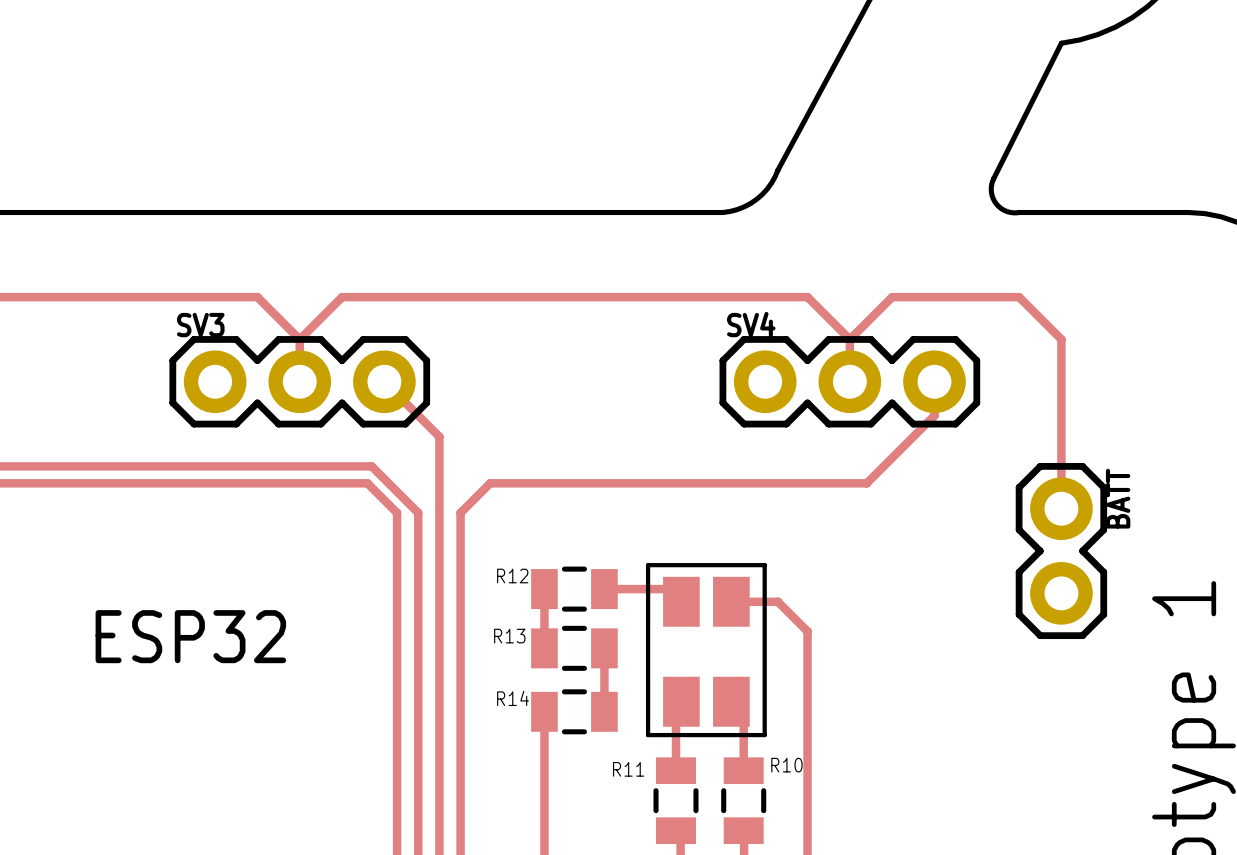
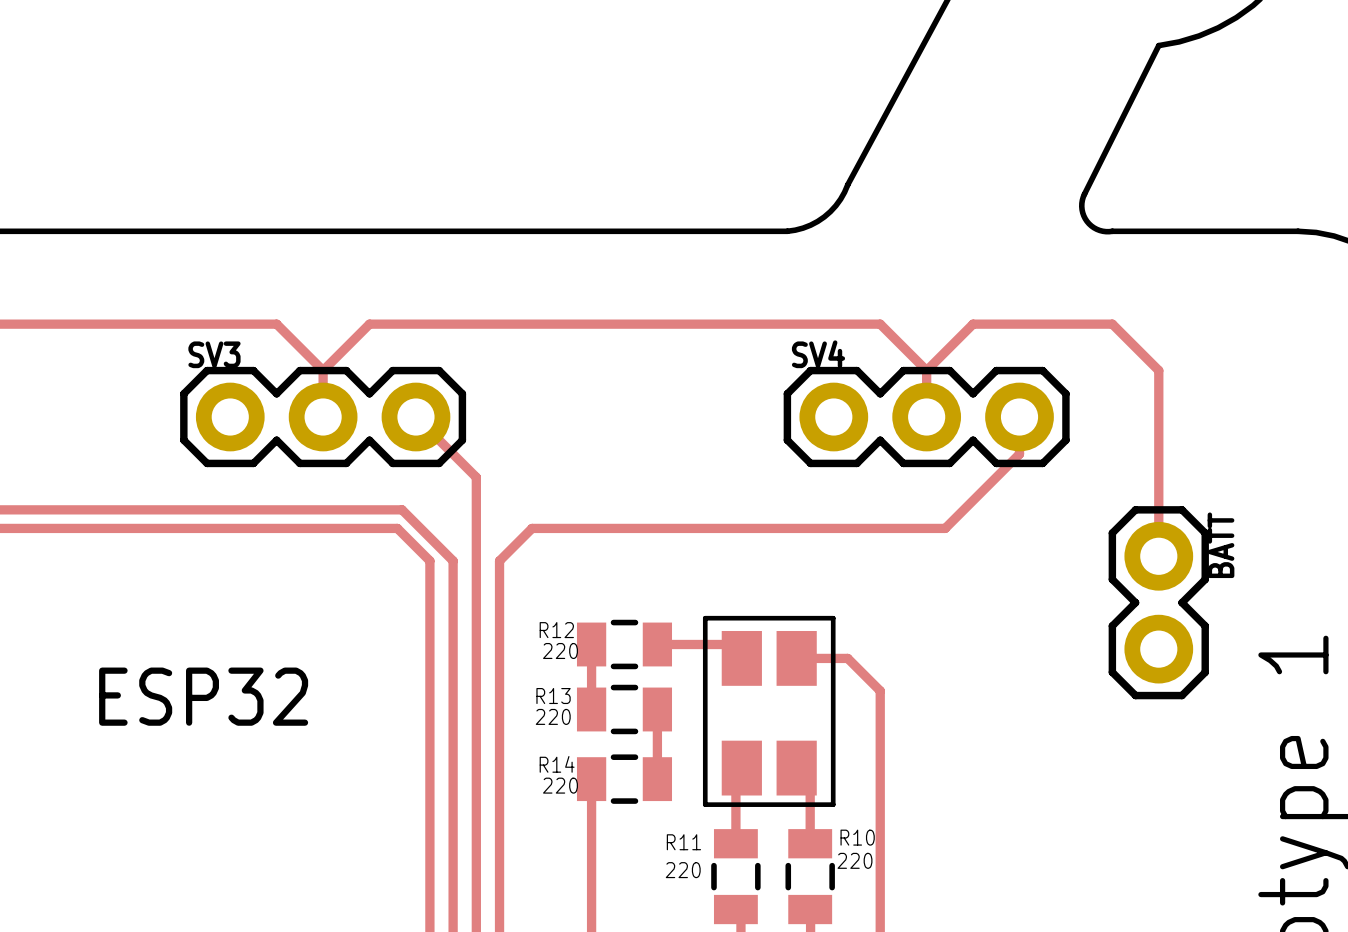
R12 value: none -> 220 (560, 650)
R13 value: none -> 220 (553, 716)
R14 value: none -> 220 (560, 785)
R10 value: none -> 220 (854, 860)
R11 value: none -> 220 (683, 870)

